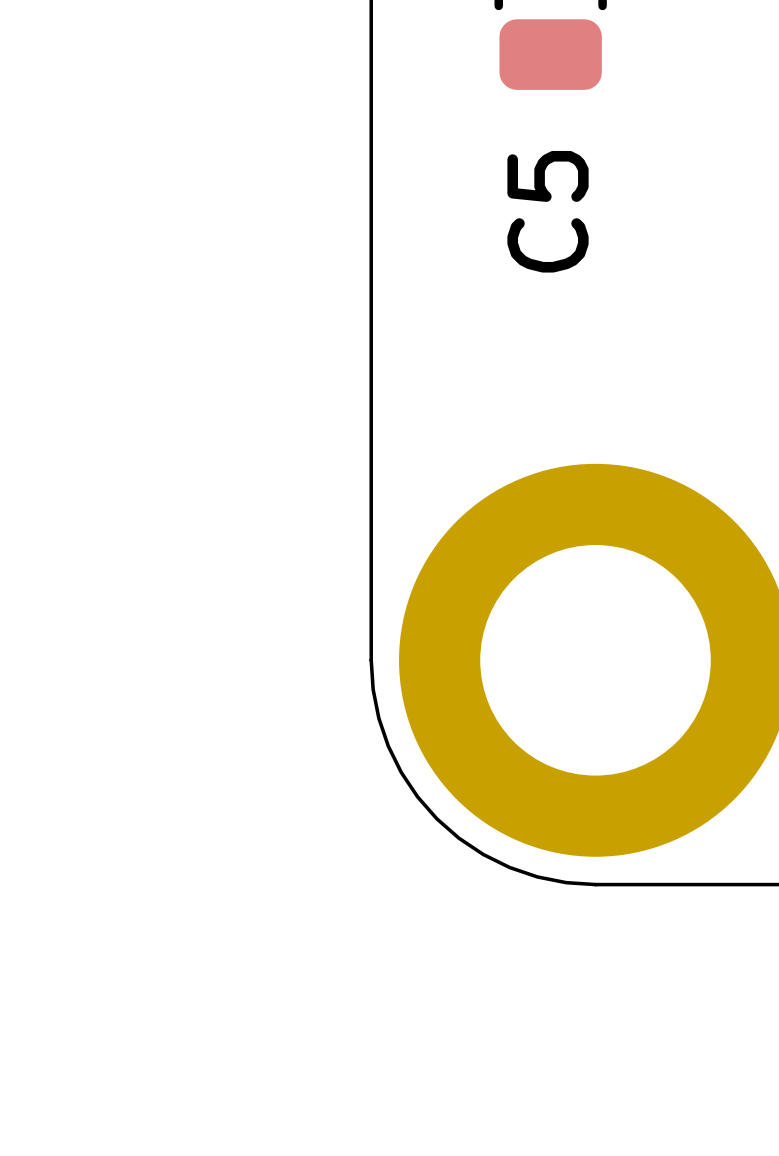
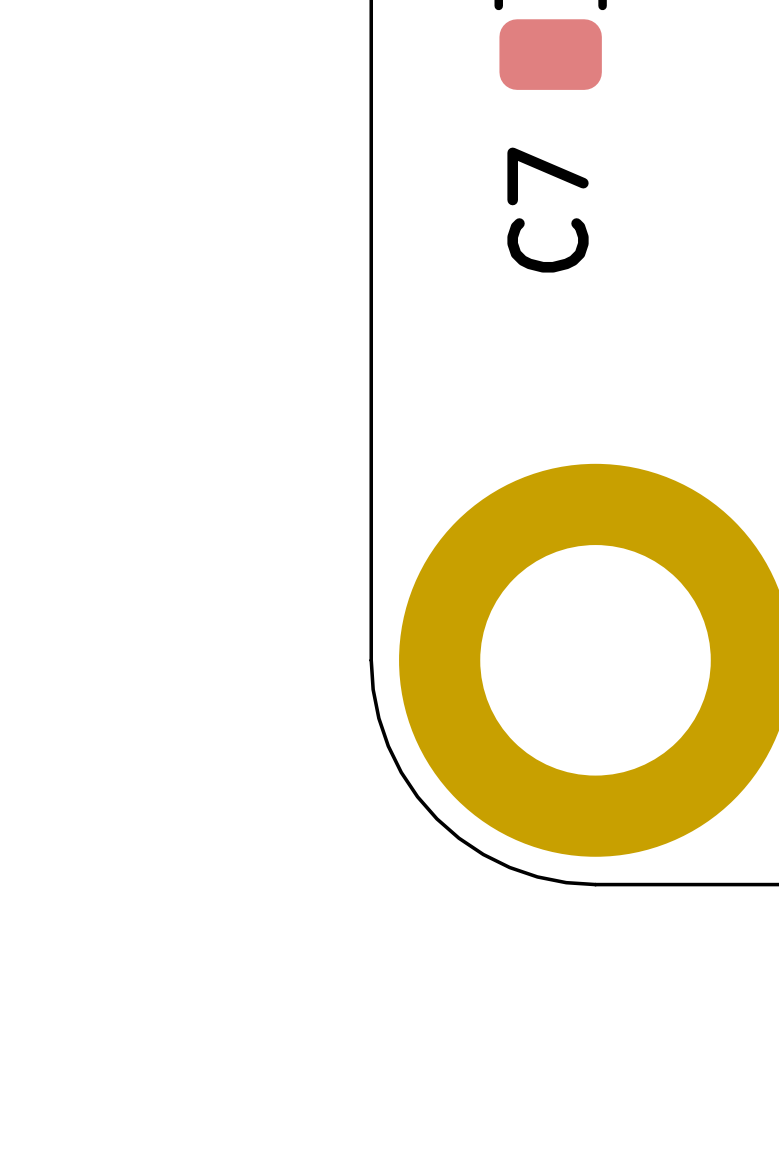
C5 name: C5 (548, 211) -> C7 (548, 210)

